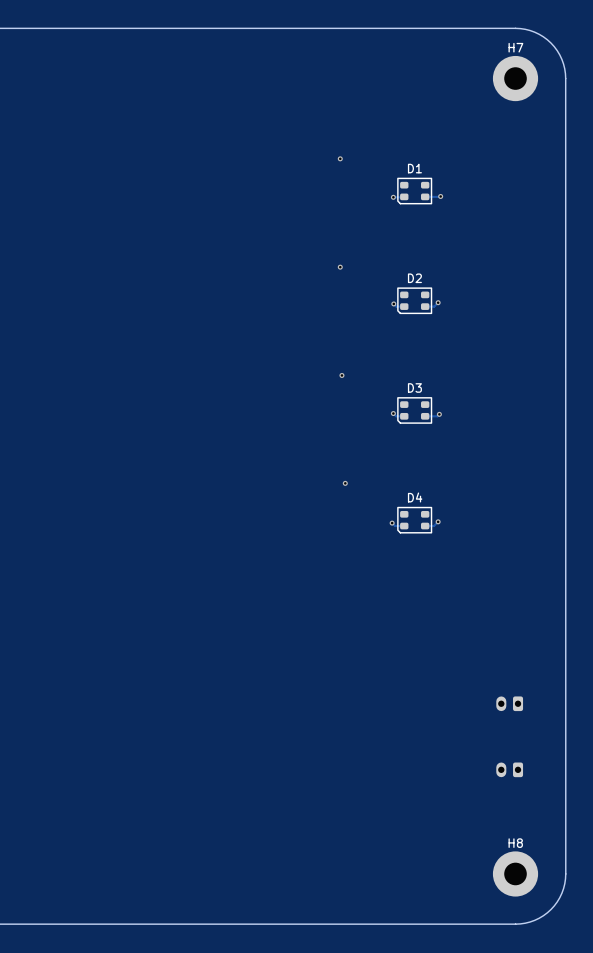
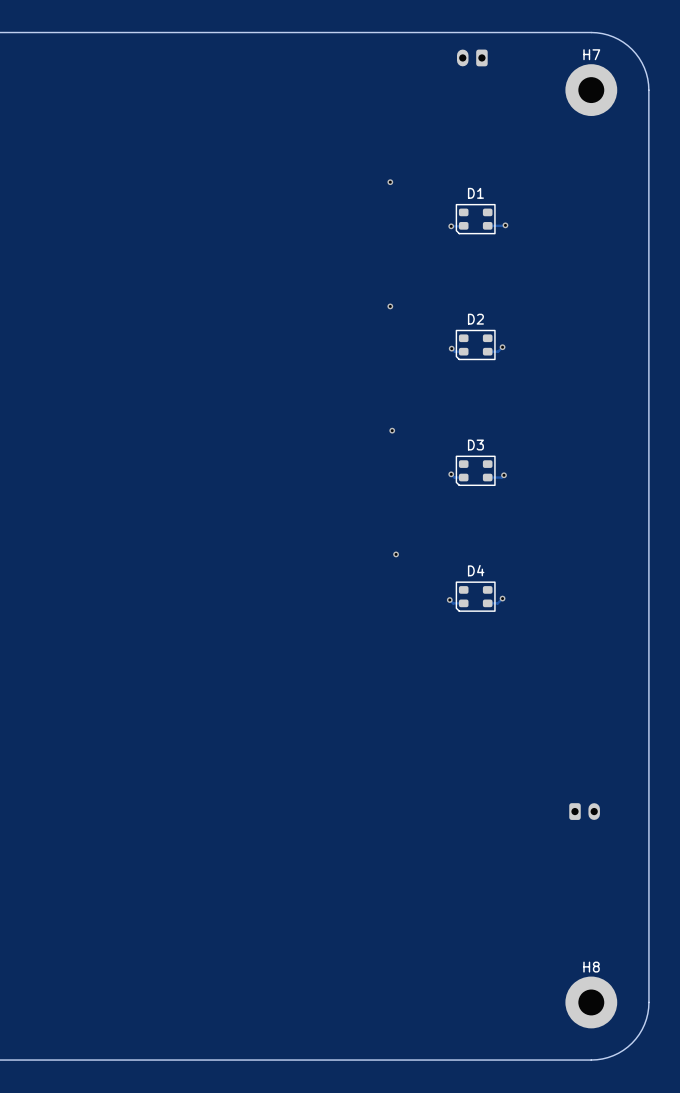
part: none -> (472, 57)
part rotation: 0° (509, 703) -> 180° (584, 811)
part: (509, 769) -> none

